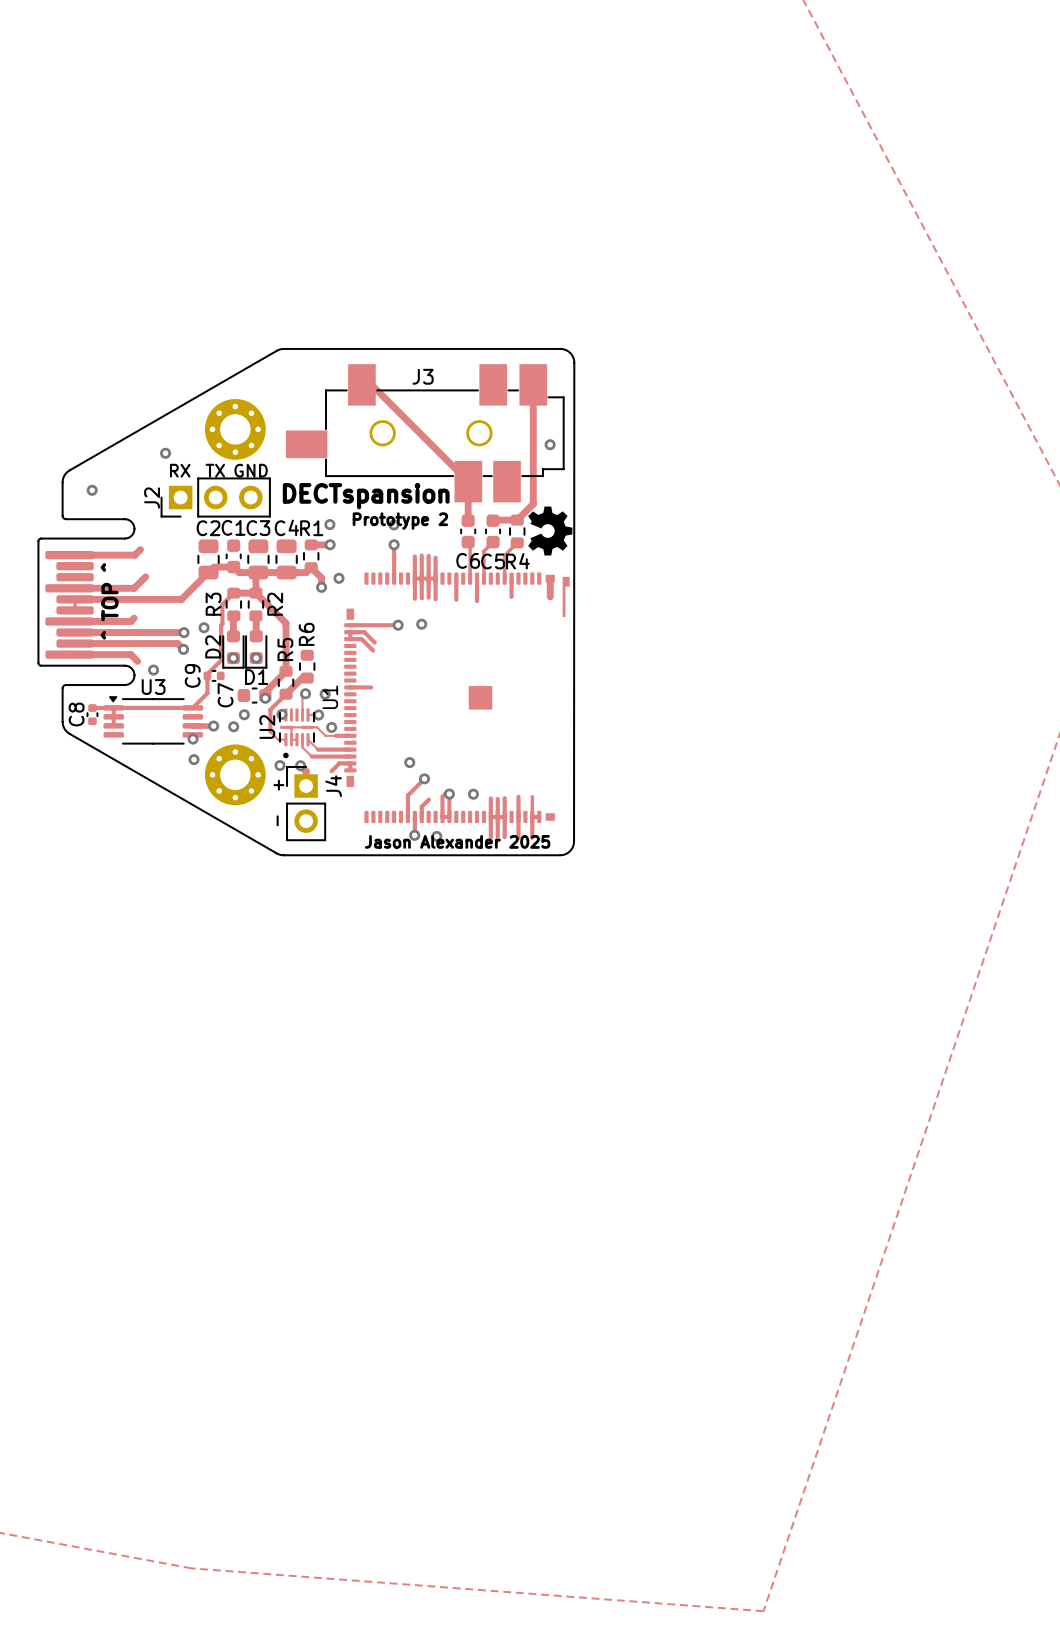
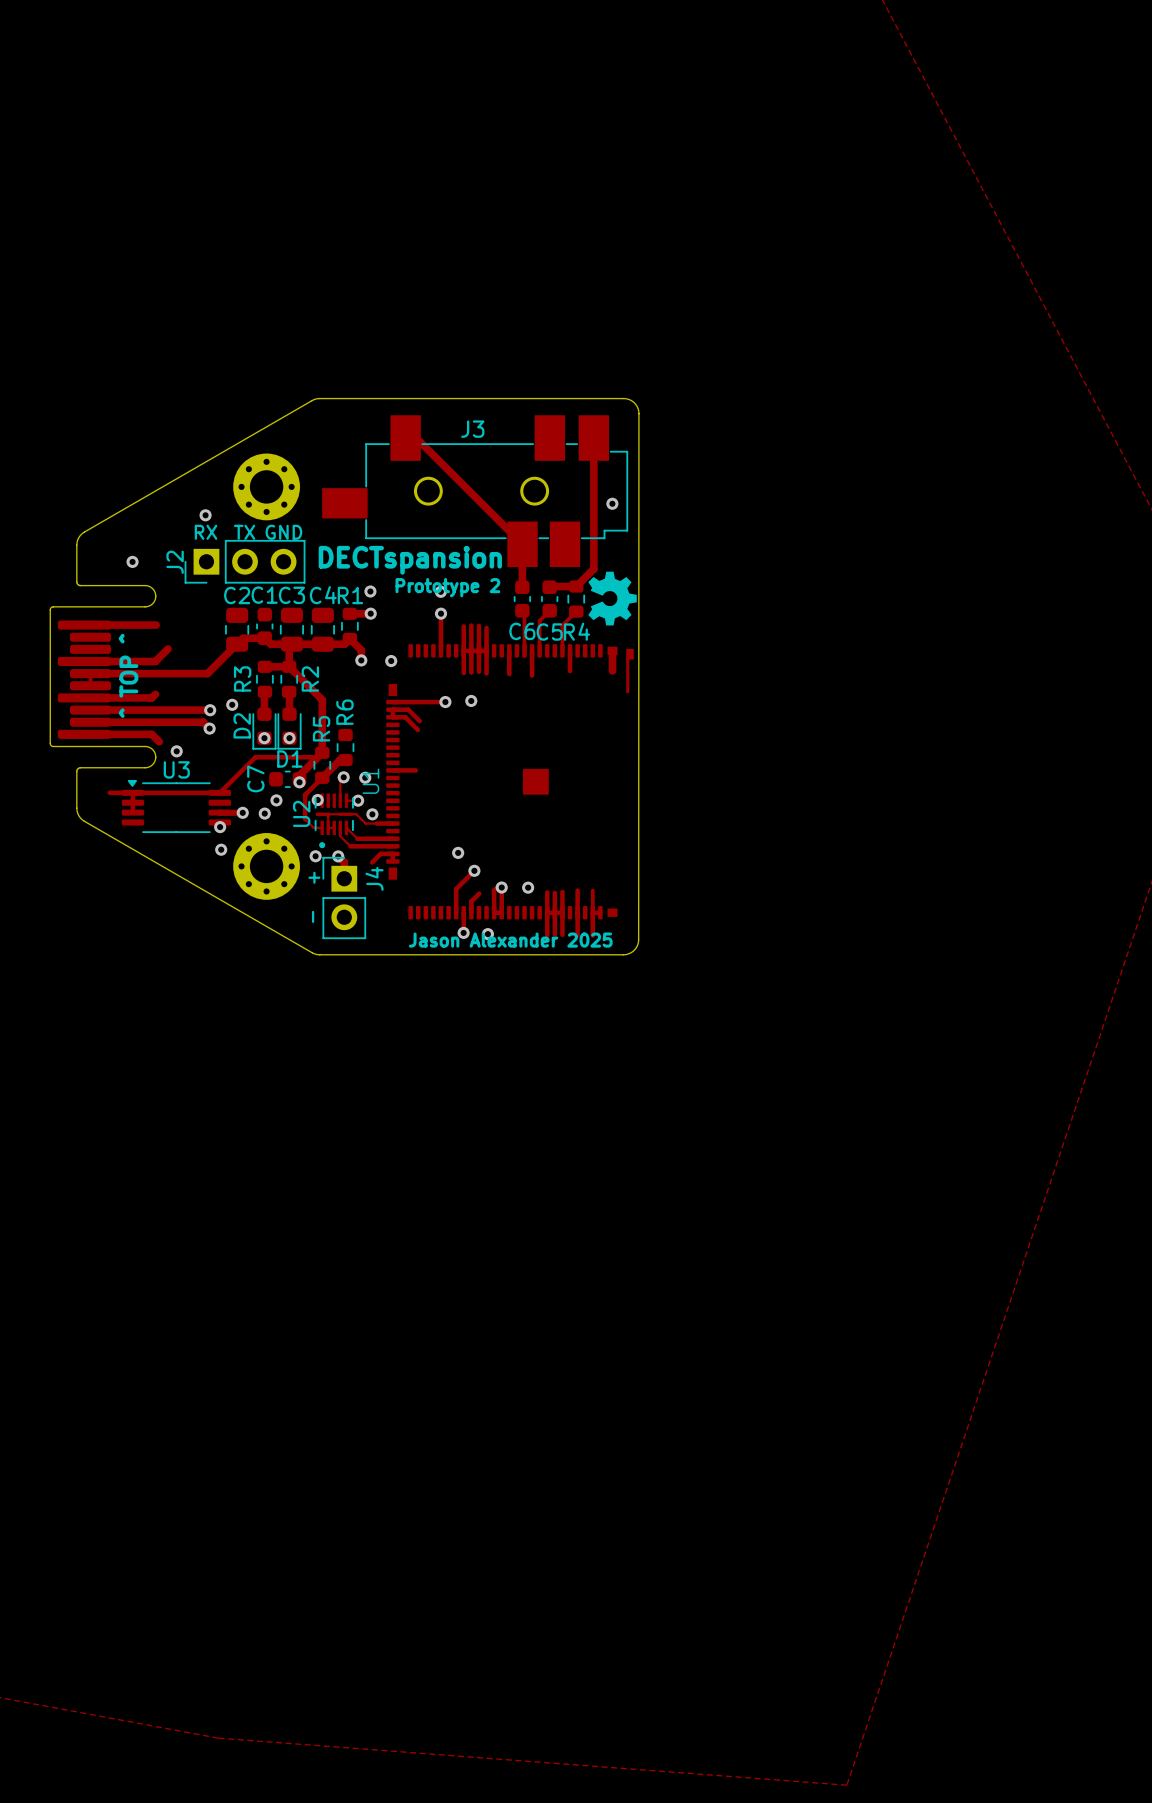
via position: (165, 453) -> (205, 515)
via position: (92, 490) -> (132, 561)
track: (140, 549) (134, 555) -> none
via position: (338, 578) -> (391, 661)
track: (233, 593) (222, 604) (221, 660) (207, 674) (207, 693) -> (322, 752) (317, 757) (255, 757) (235, 776)
C9: (214, 675) -> none
C8: (92, 714) -> none

